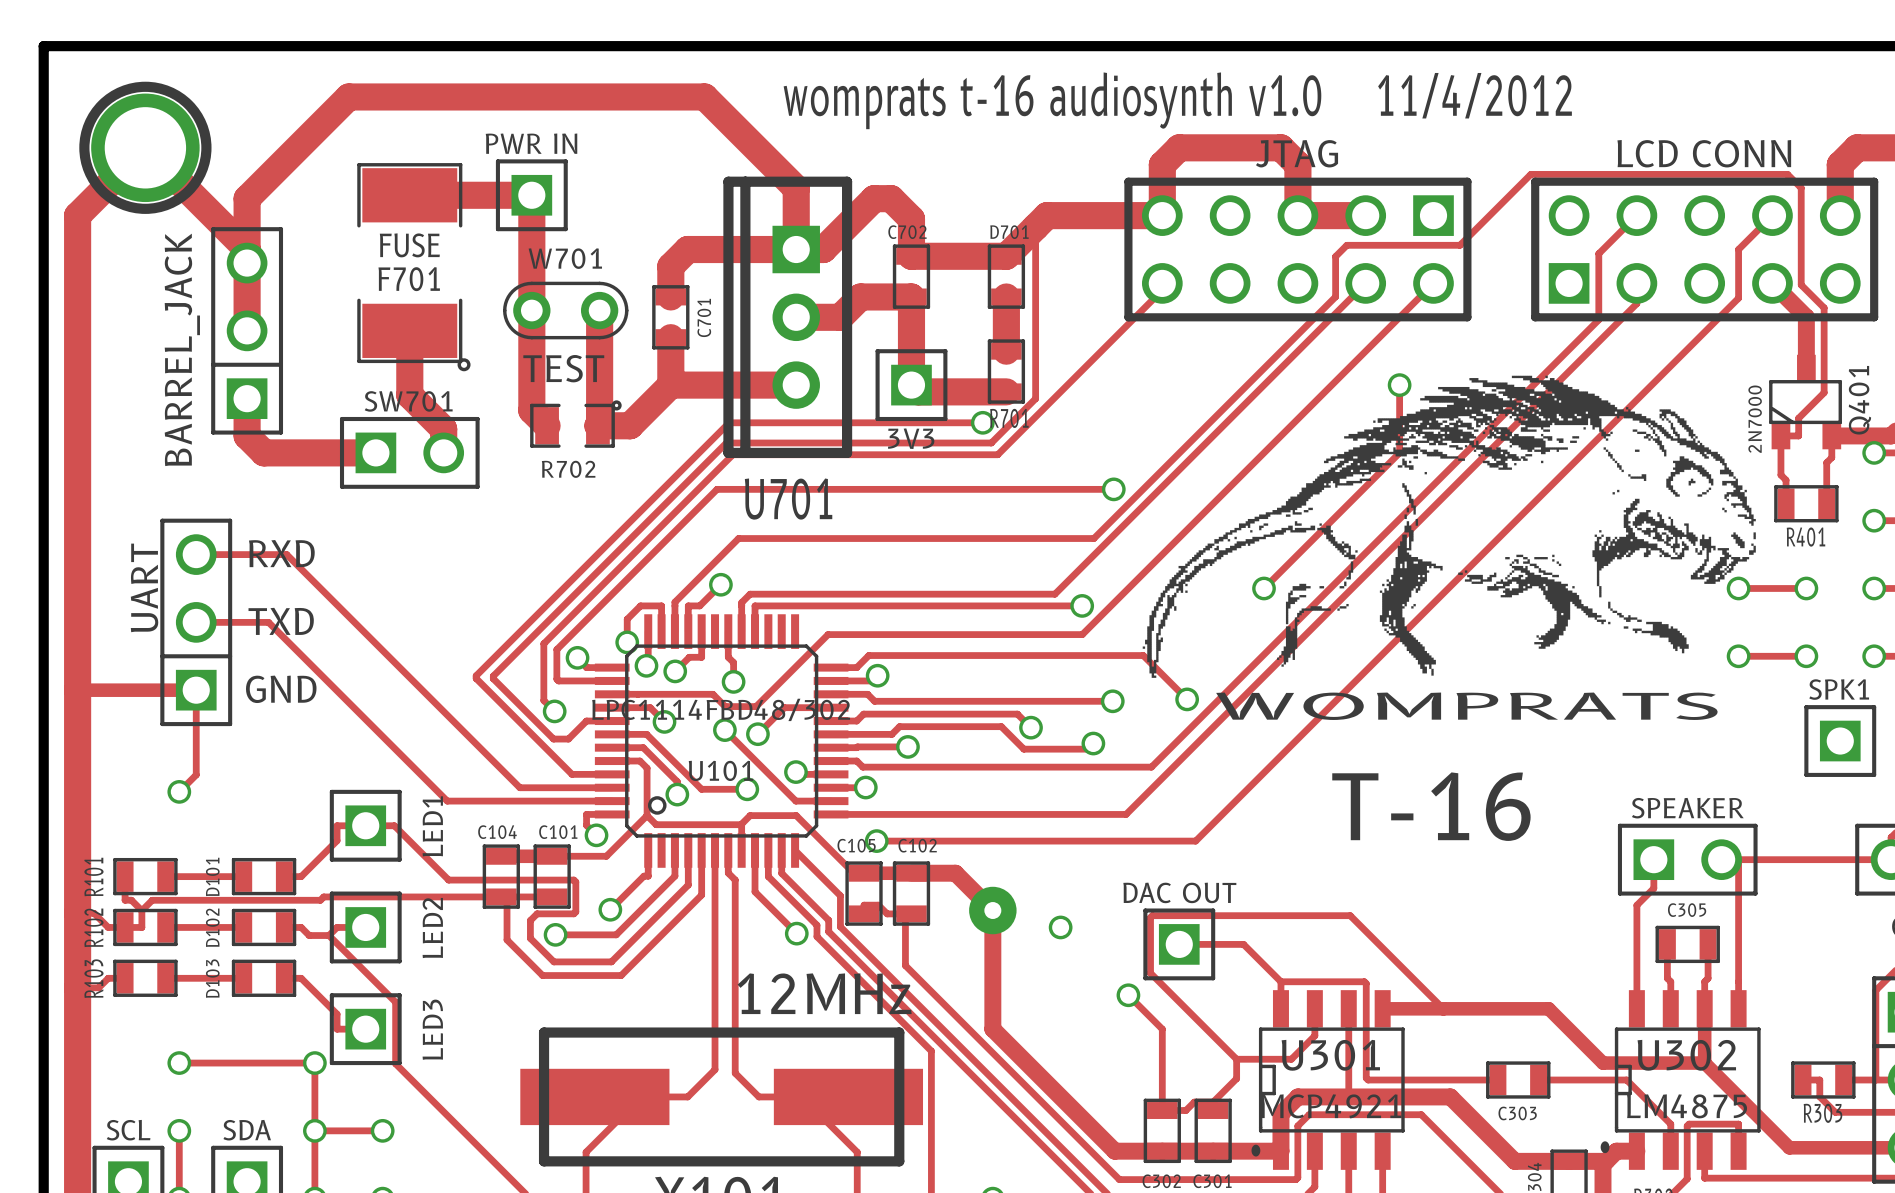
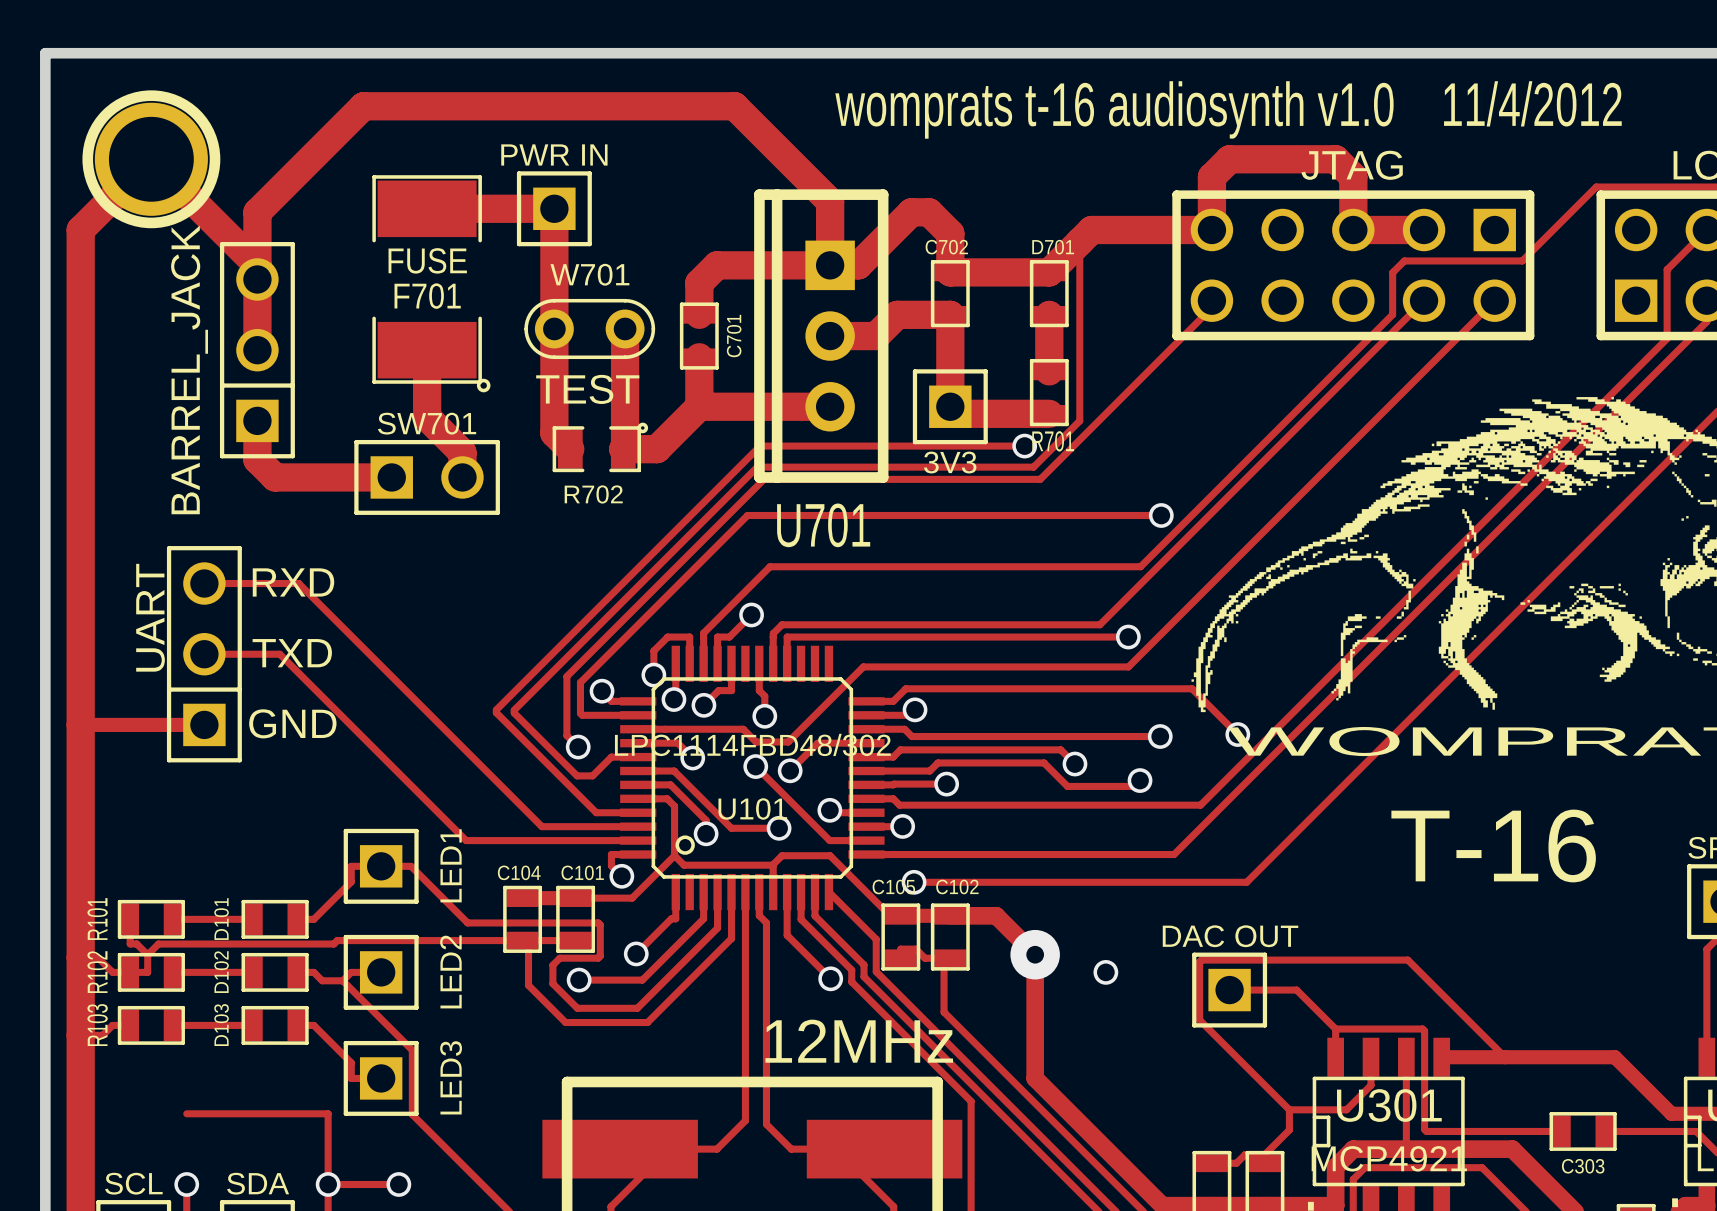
track: (1399, 385) (1399, 452) (1264, 588) -> none
via: (1399, 385) -> none
via: (1264, 588) -> none
track: (196, 690) (196, 774) (179, 791) -> none
via: (179, 791) -> none
track: (1128, 995) (1162, 1029) (1162, 1110) -> none
via: (1128, 995) -> none
via: (179, 1063) -> none
via: (314, 1063) -> none

